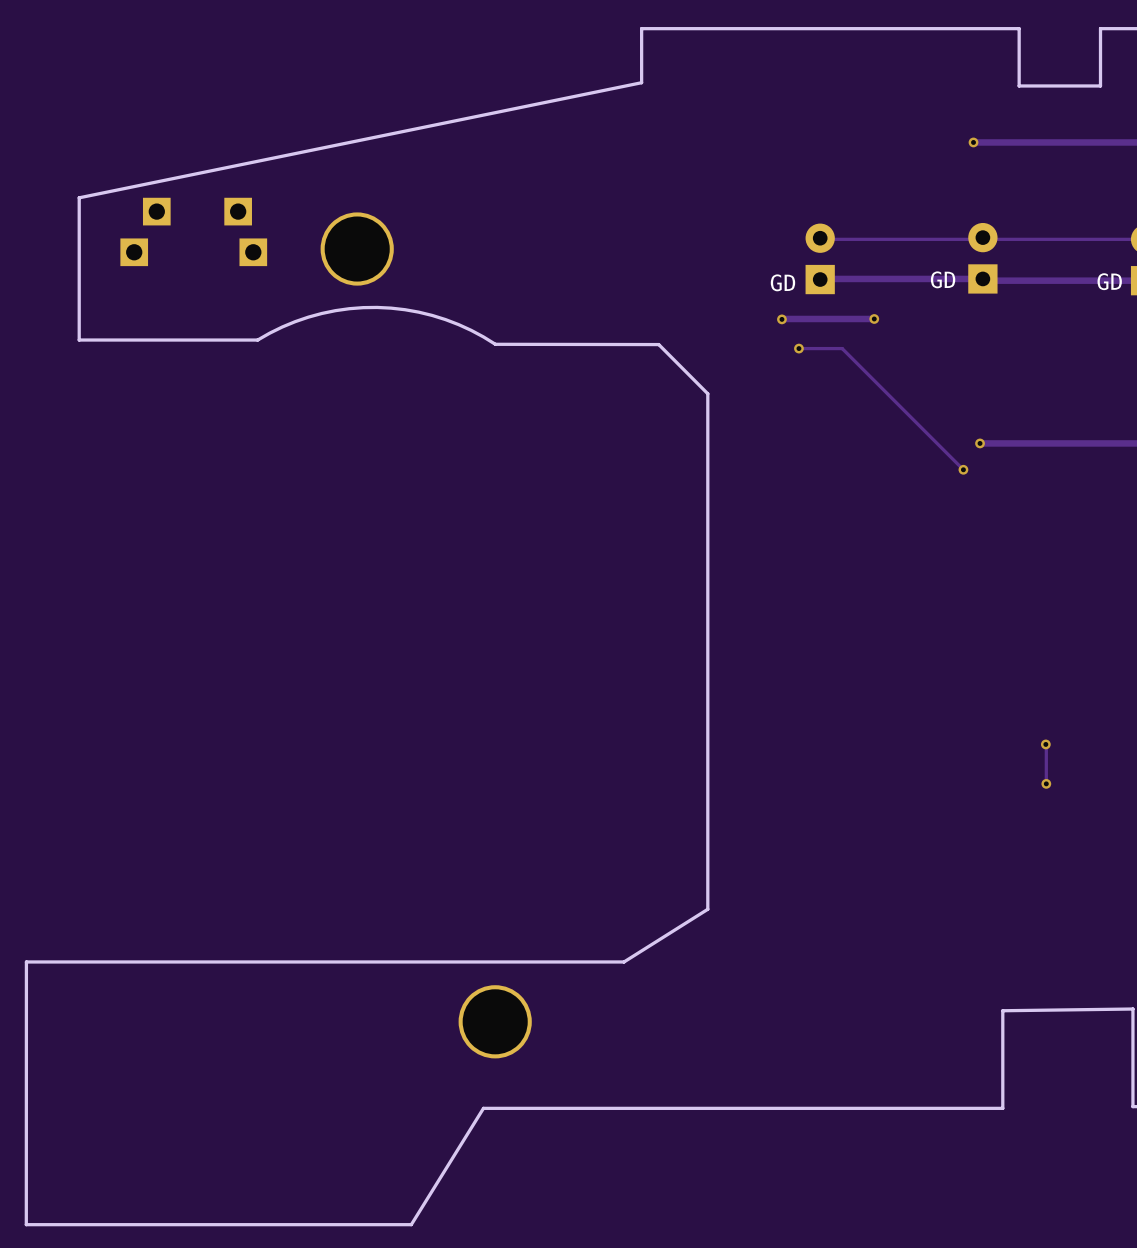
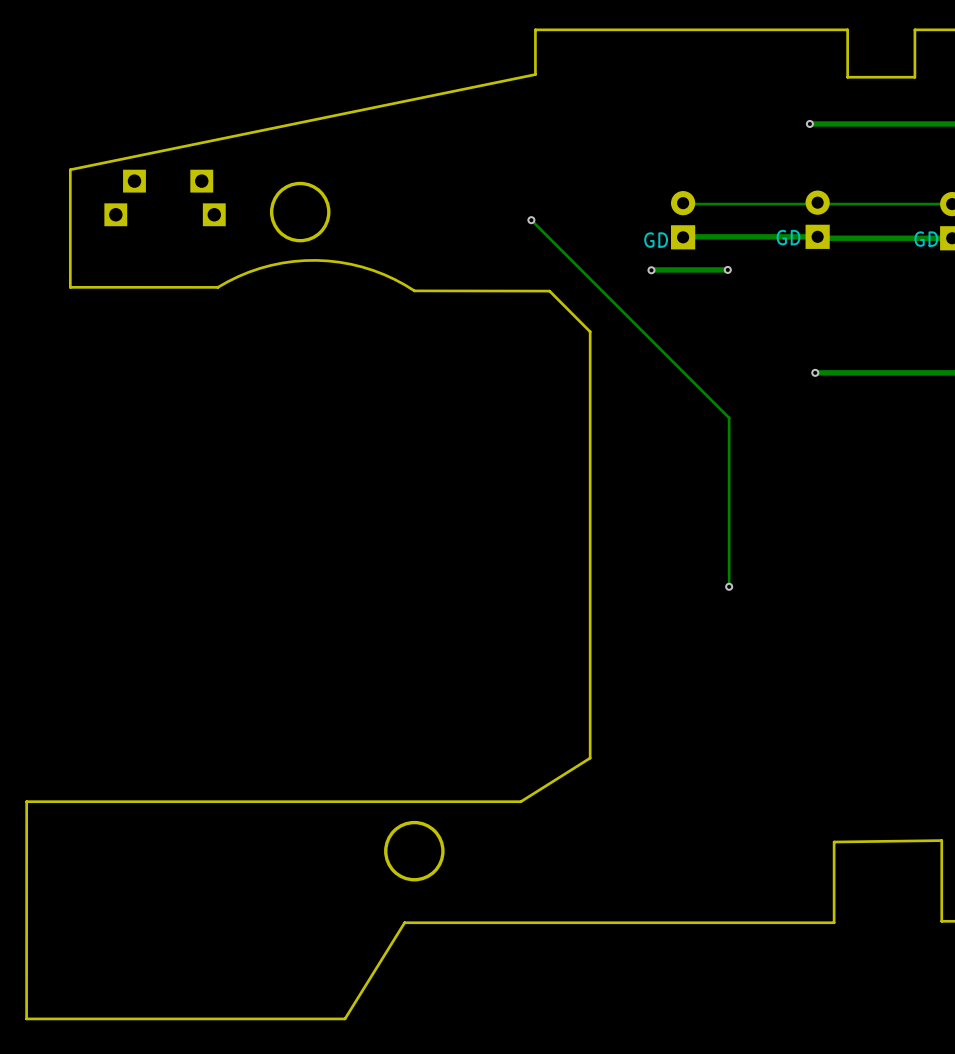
track: none -> (531, 220) (729, 417) (729, 586)
via: none -> (531, 220)
track: (798, 348) (842, 348) (963, 469) -> none
via: (798, 348) -> none
via: (963, 469) -> none
via: none -> (729, 586)
track: (1045, 744) (1046, 783) -> none
via: (1045, 744) -> none
via: (1046, 783) -> none

